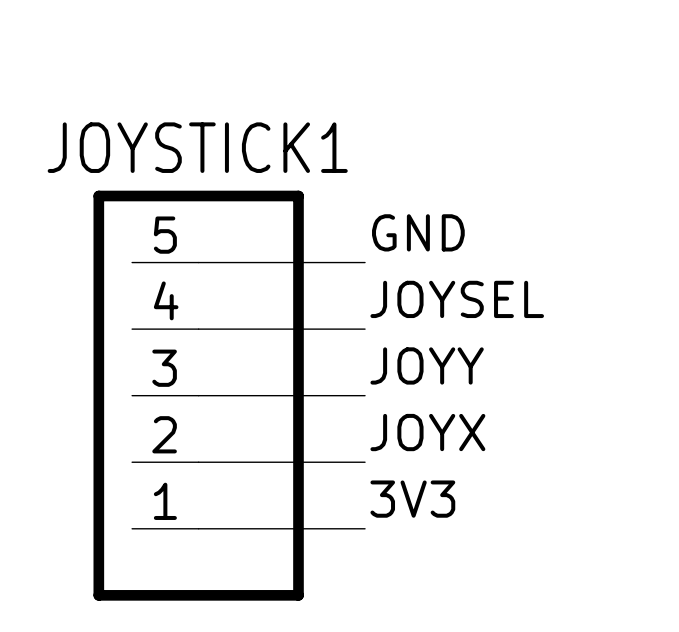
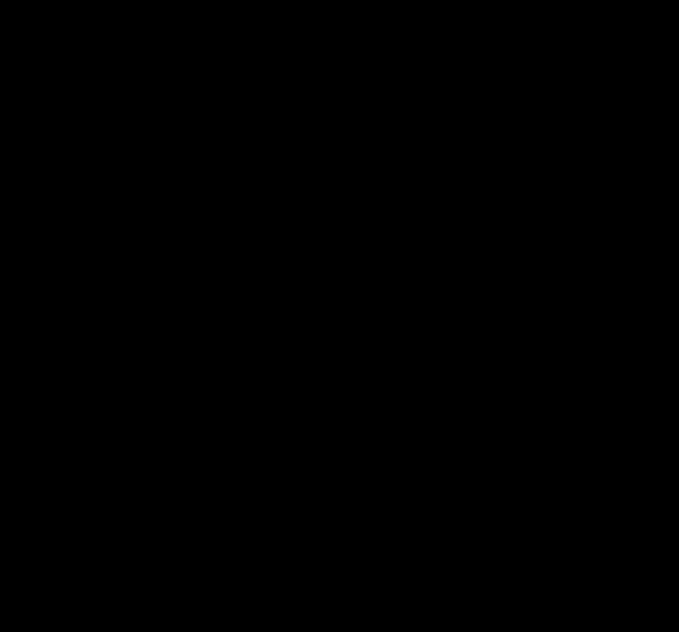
label: GND (418, 232) -> none
wire: (198, 262) (365, 262) -> none
label: JOYSEL (457, 299) -> none
wire: (198, 329) (365, 329) -> none
label: JOYY (427, 365) -> none
wire: (198, 395) (365, 395) -> none
JOYSTICK1: (198, 395) -> none
label: JOYX (427, 432) -> none
wire: (198, 462) (365, 462) -> none
label: 3V3 (412, 499) -> none
wire: (198, 528) (365, 528) -> none

